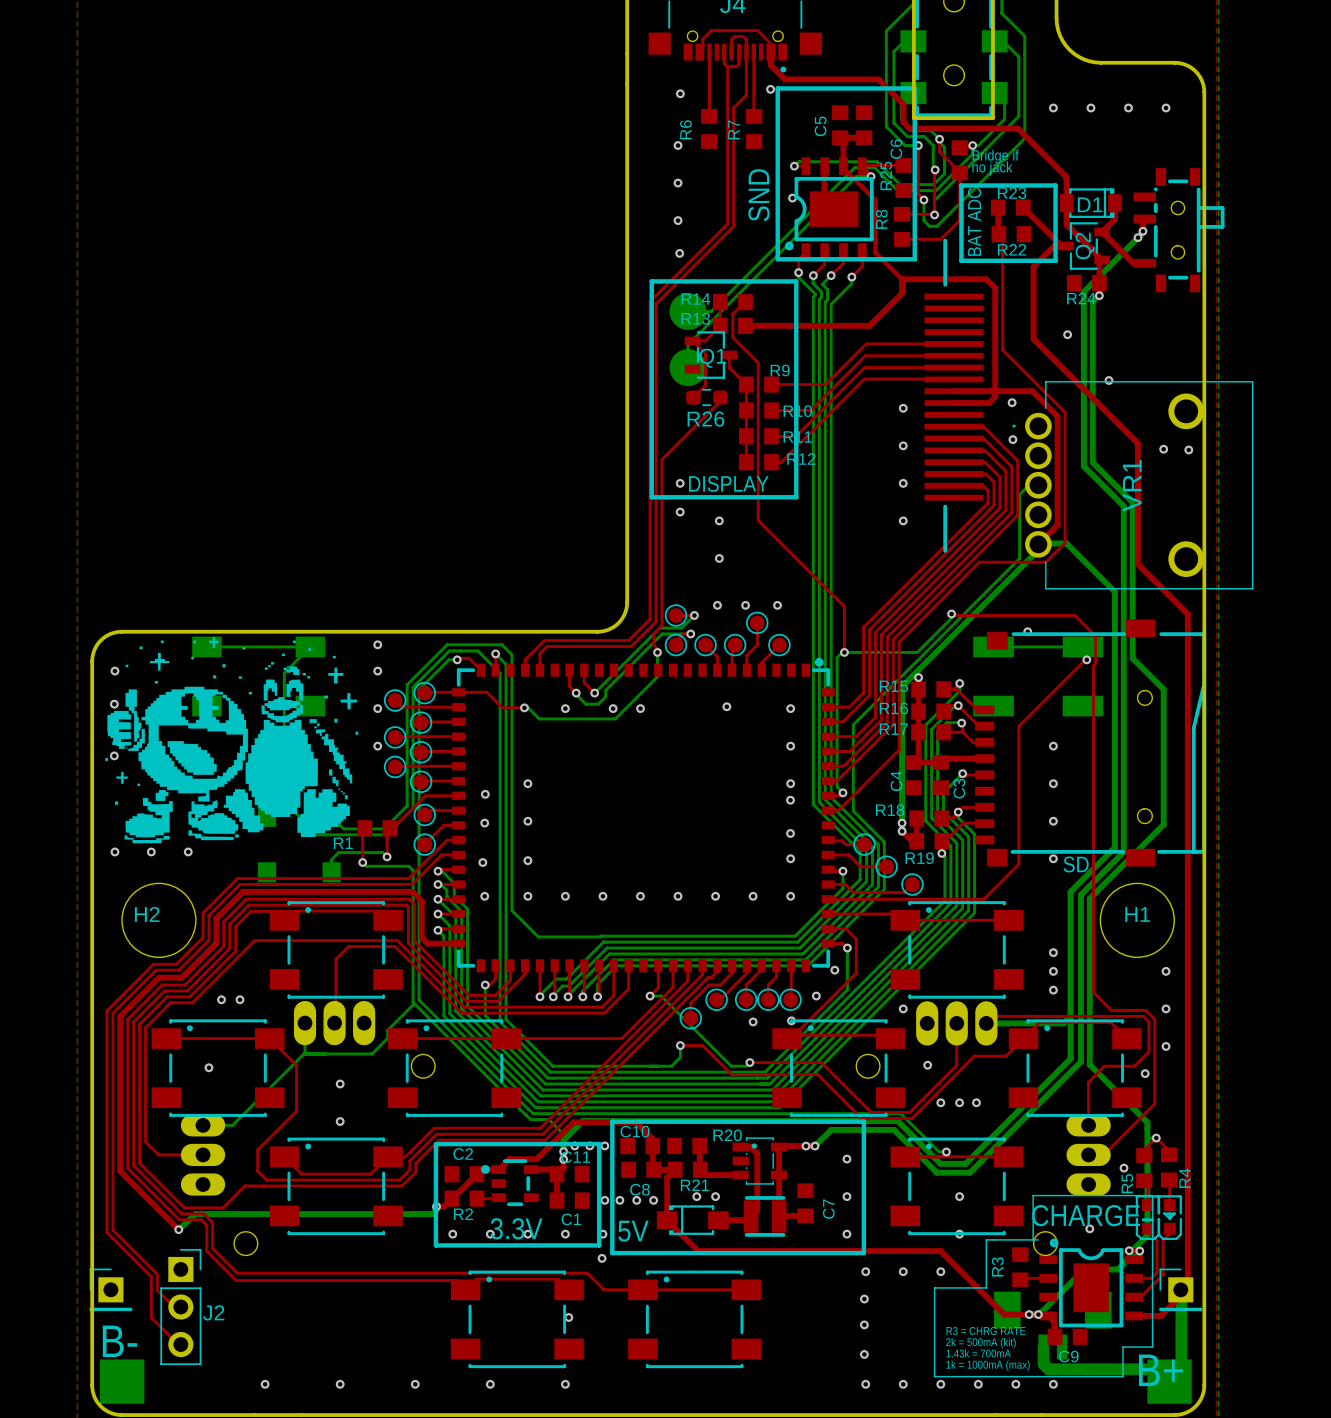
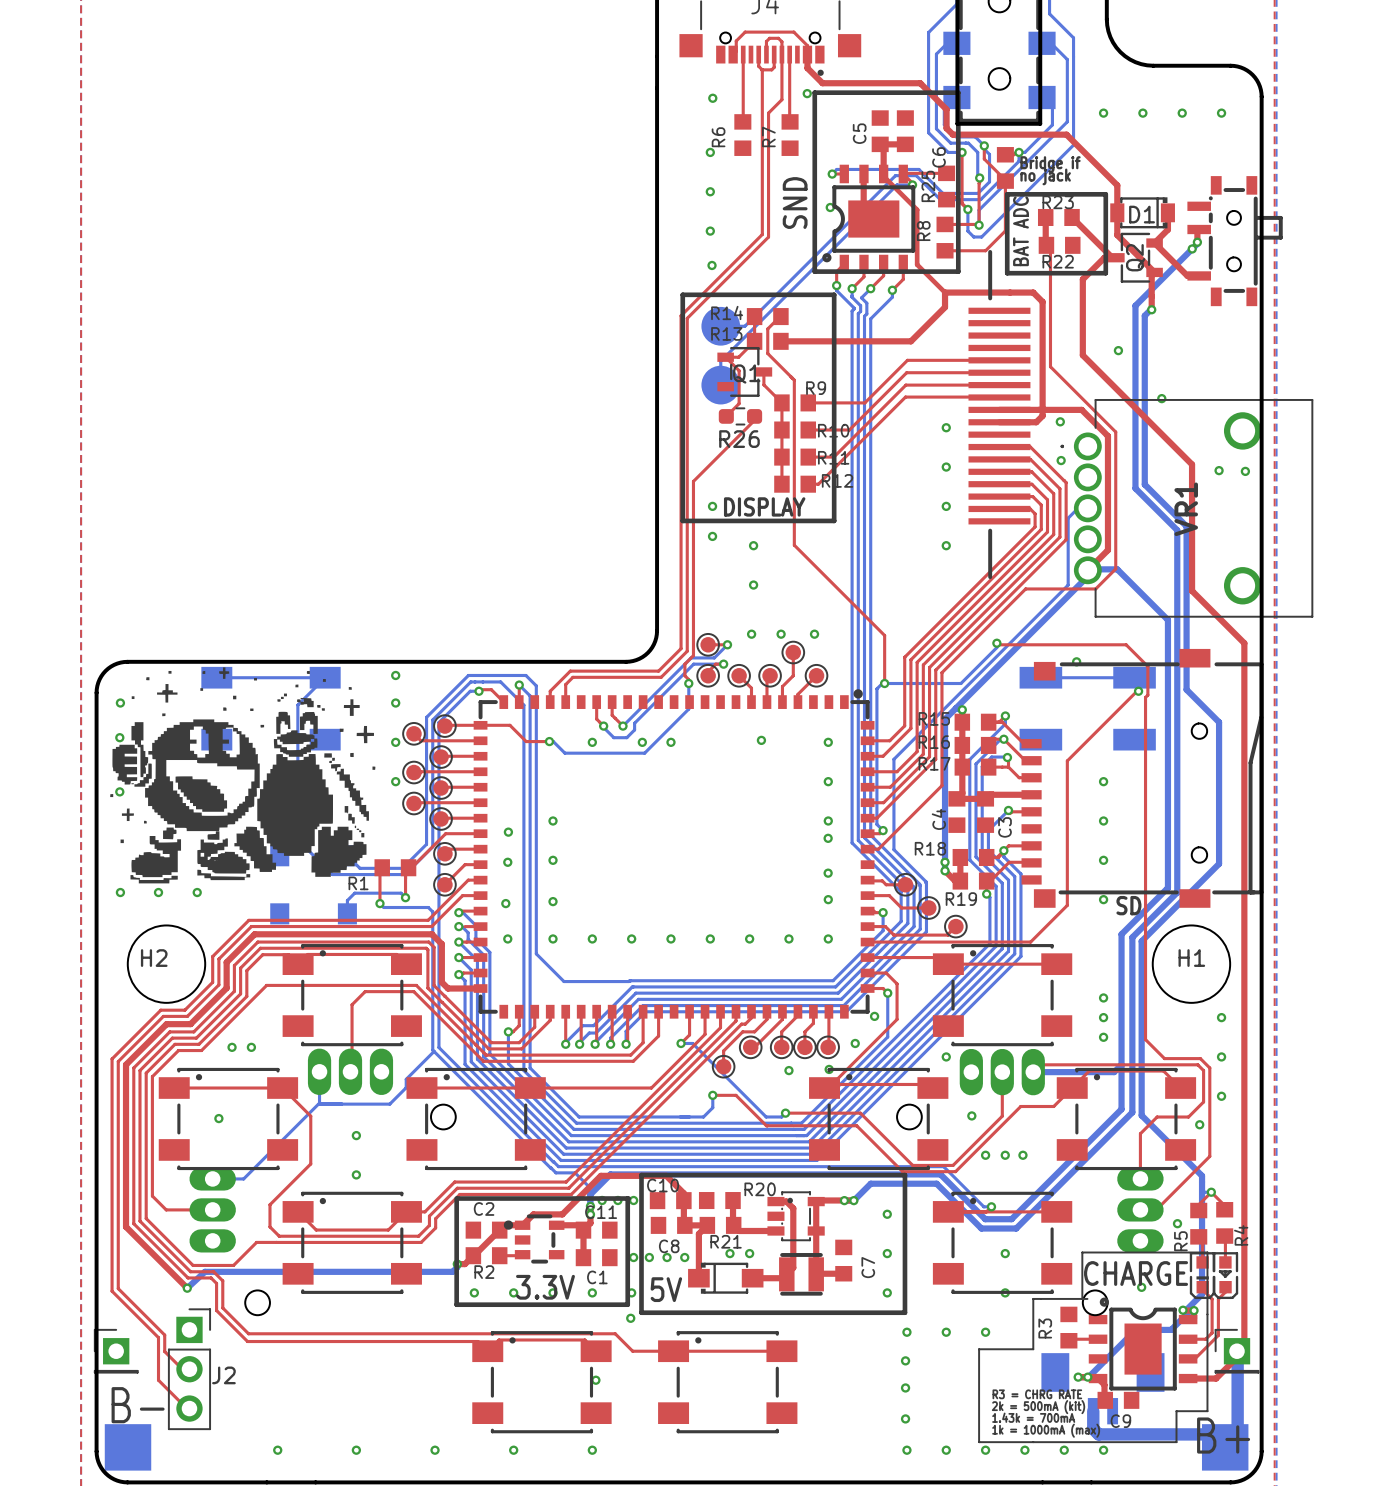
R24: (1086, 282) -> none
top track: (667, 1220) (698, 1251) (940, 1251) (1004, 1314) (1029, 1314) -> none

